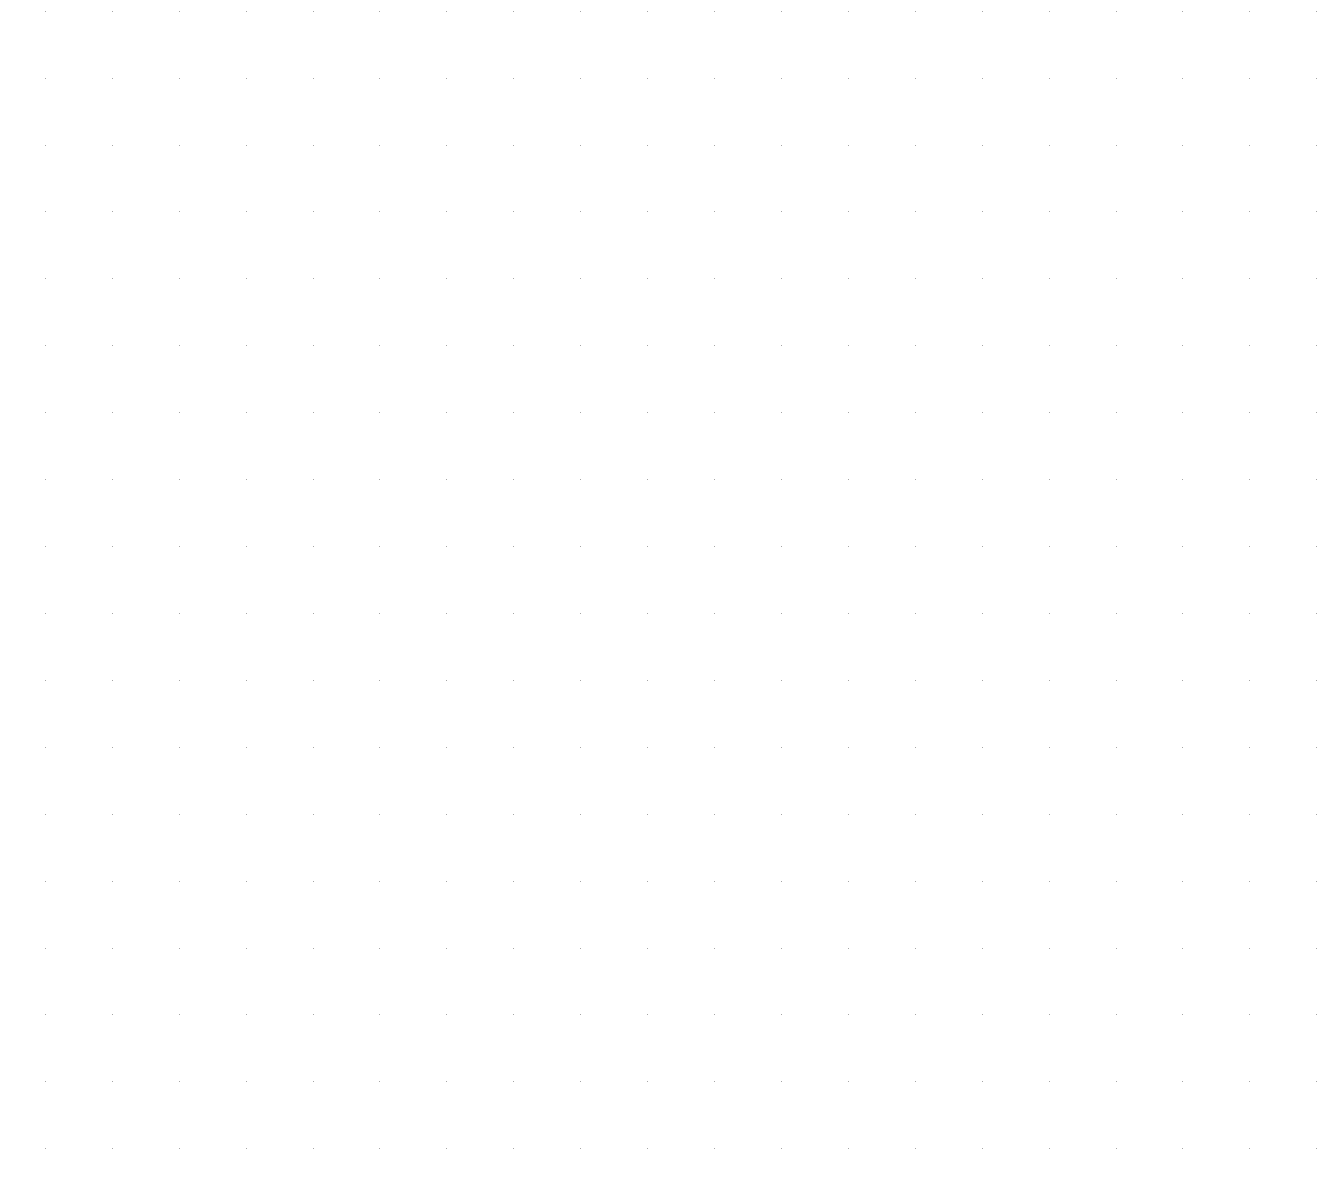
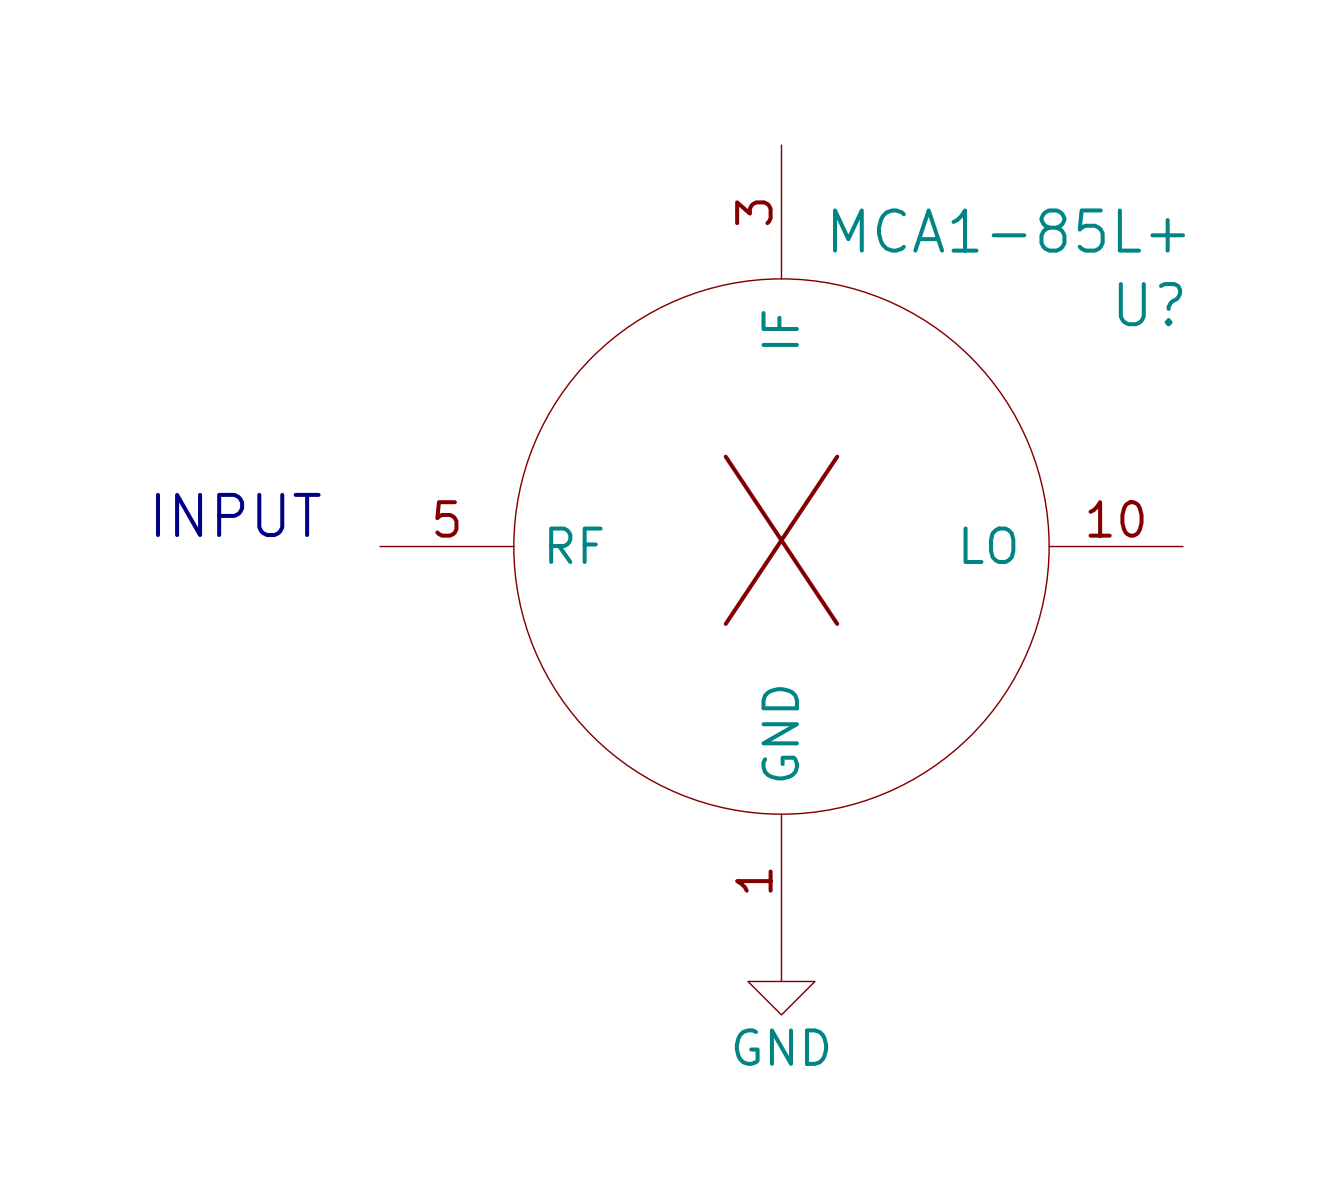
text: none -> INPUT (238, 514)
U?: none -> MCA1-85L+ (781, 546)
power symbol: none -> GND (781, 981)

